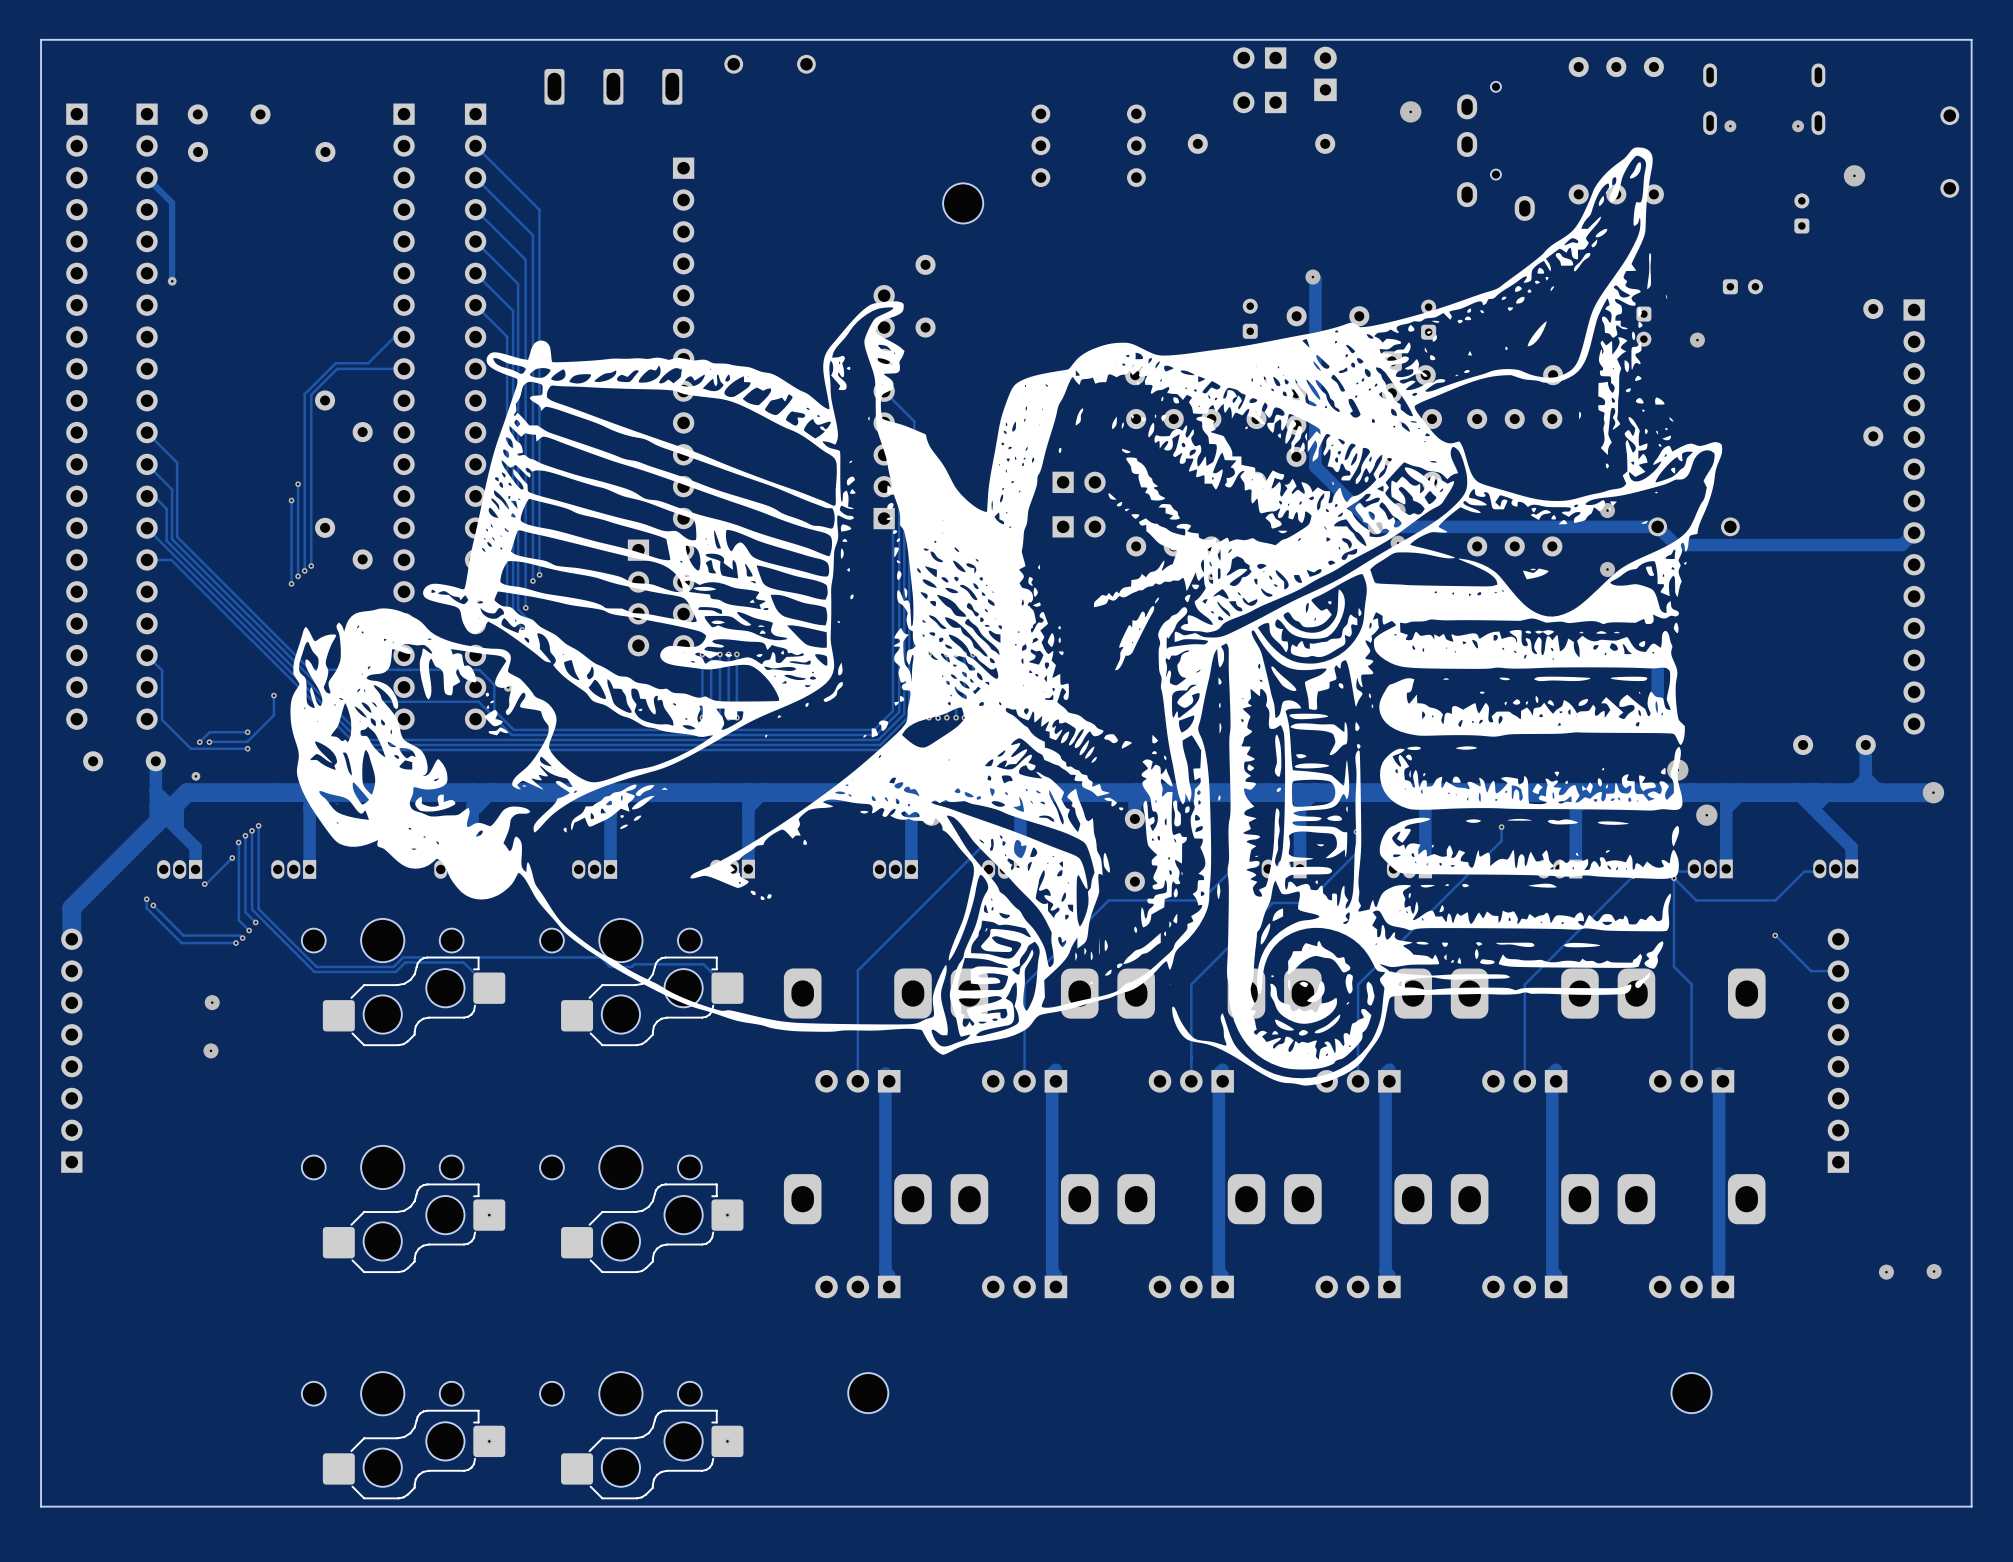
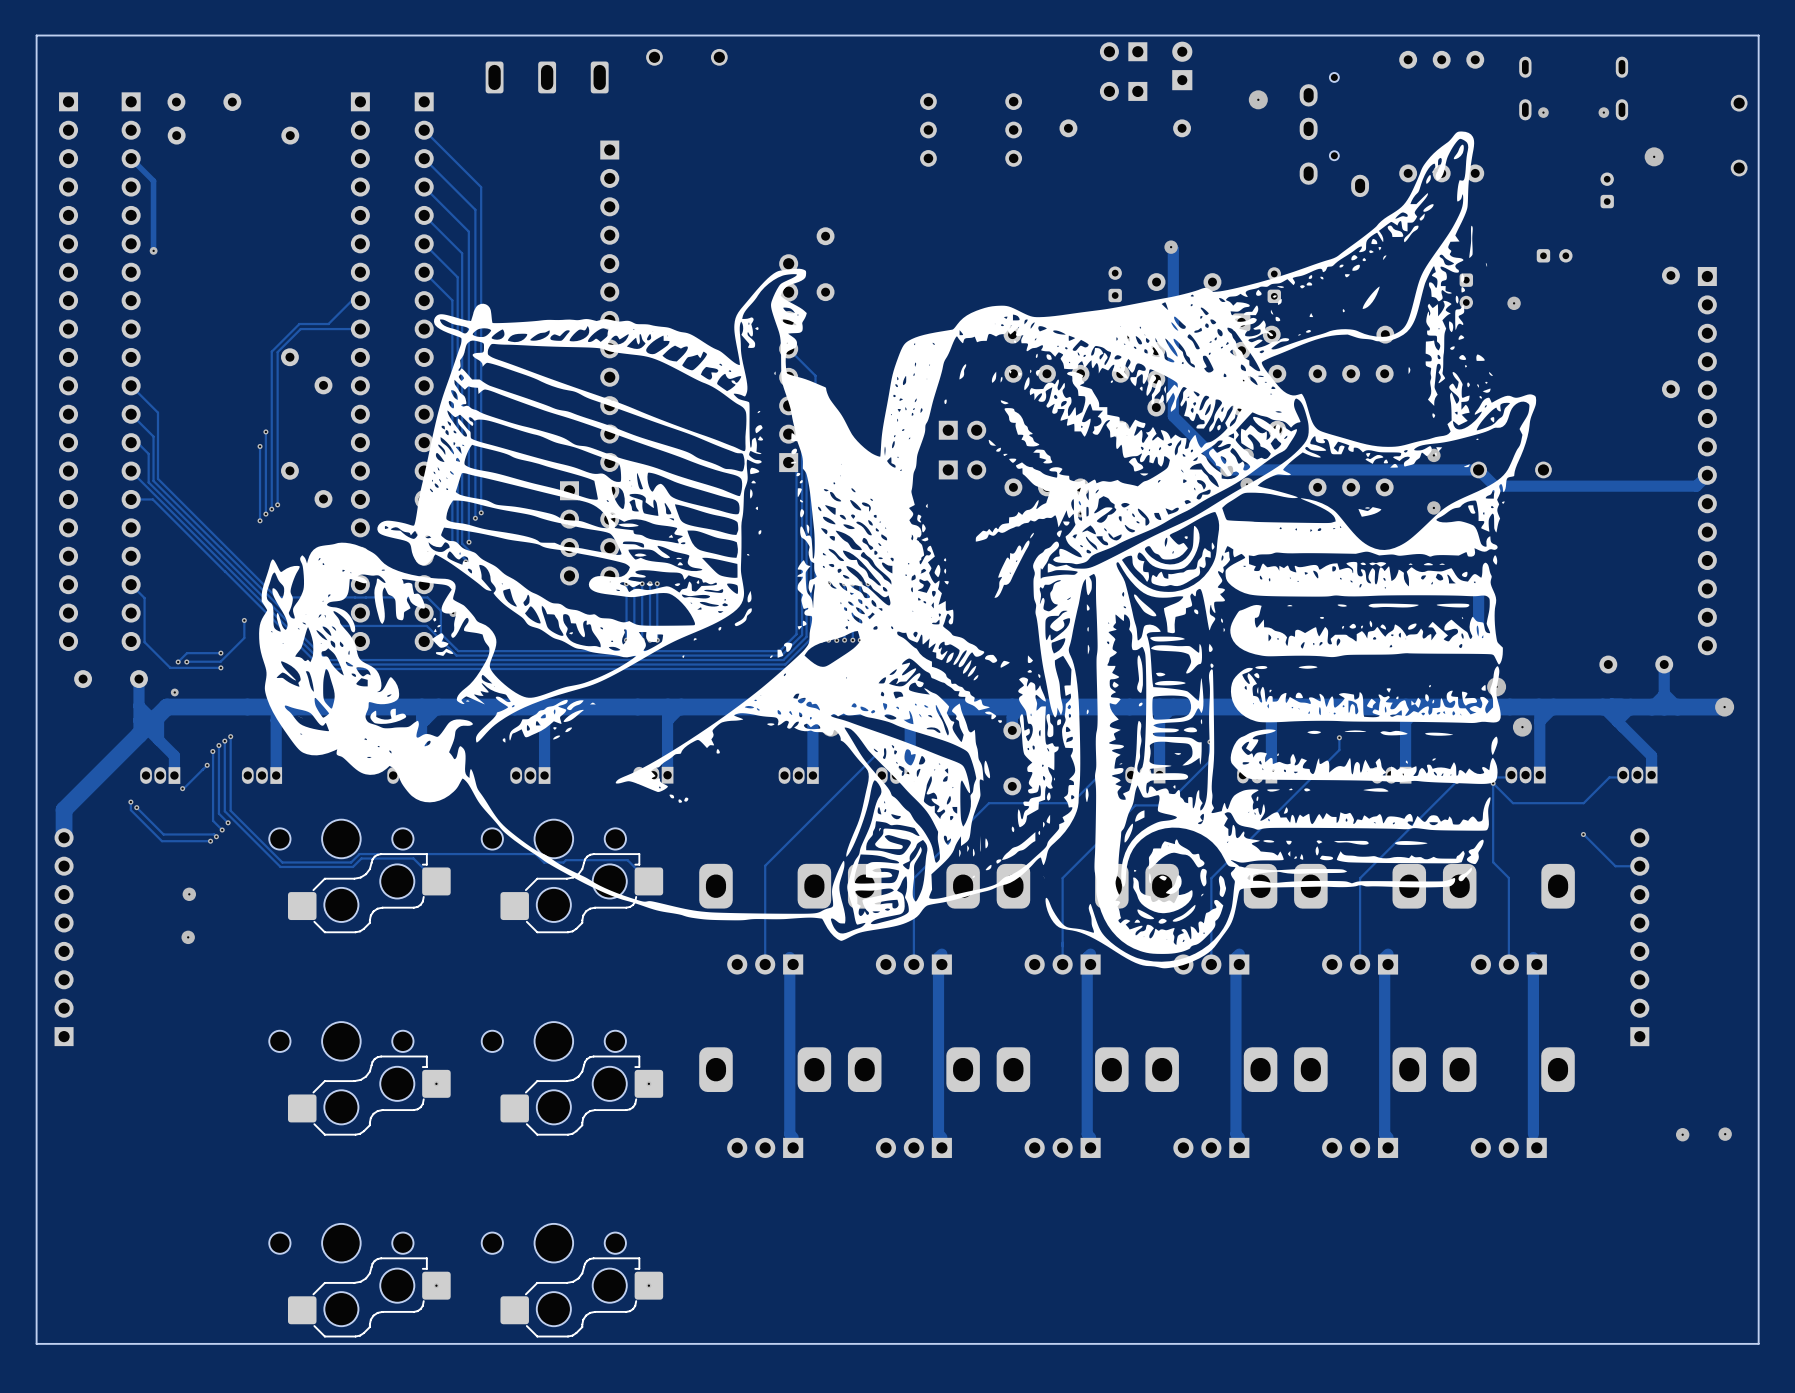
part: (963, 203) -> none
part: (868, 1393) -> none
part: (1691, 1393) -> none

